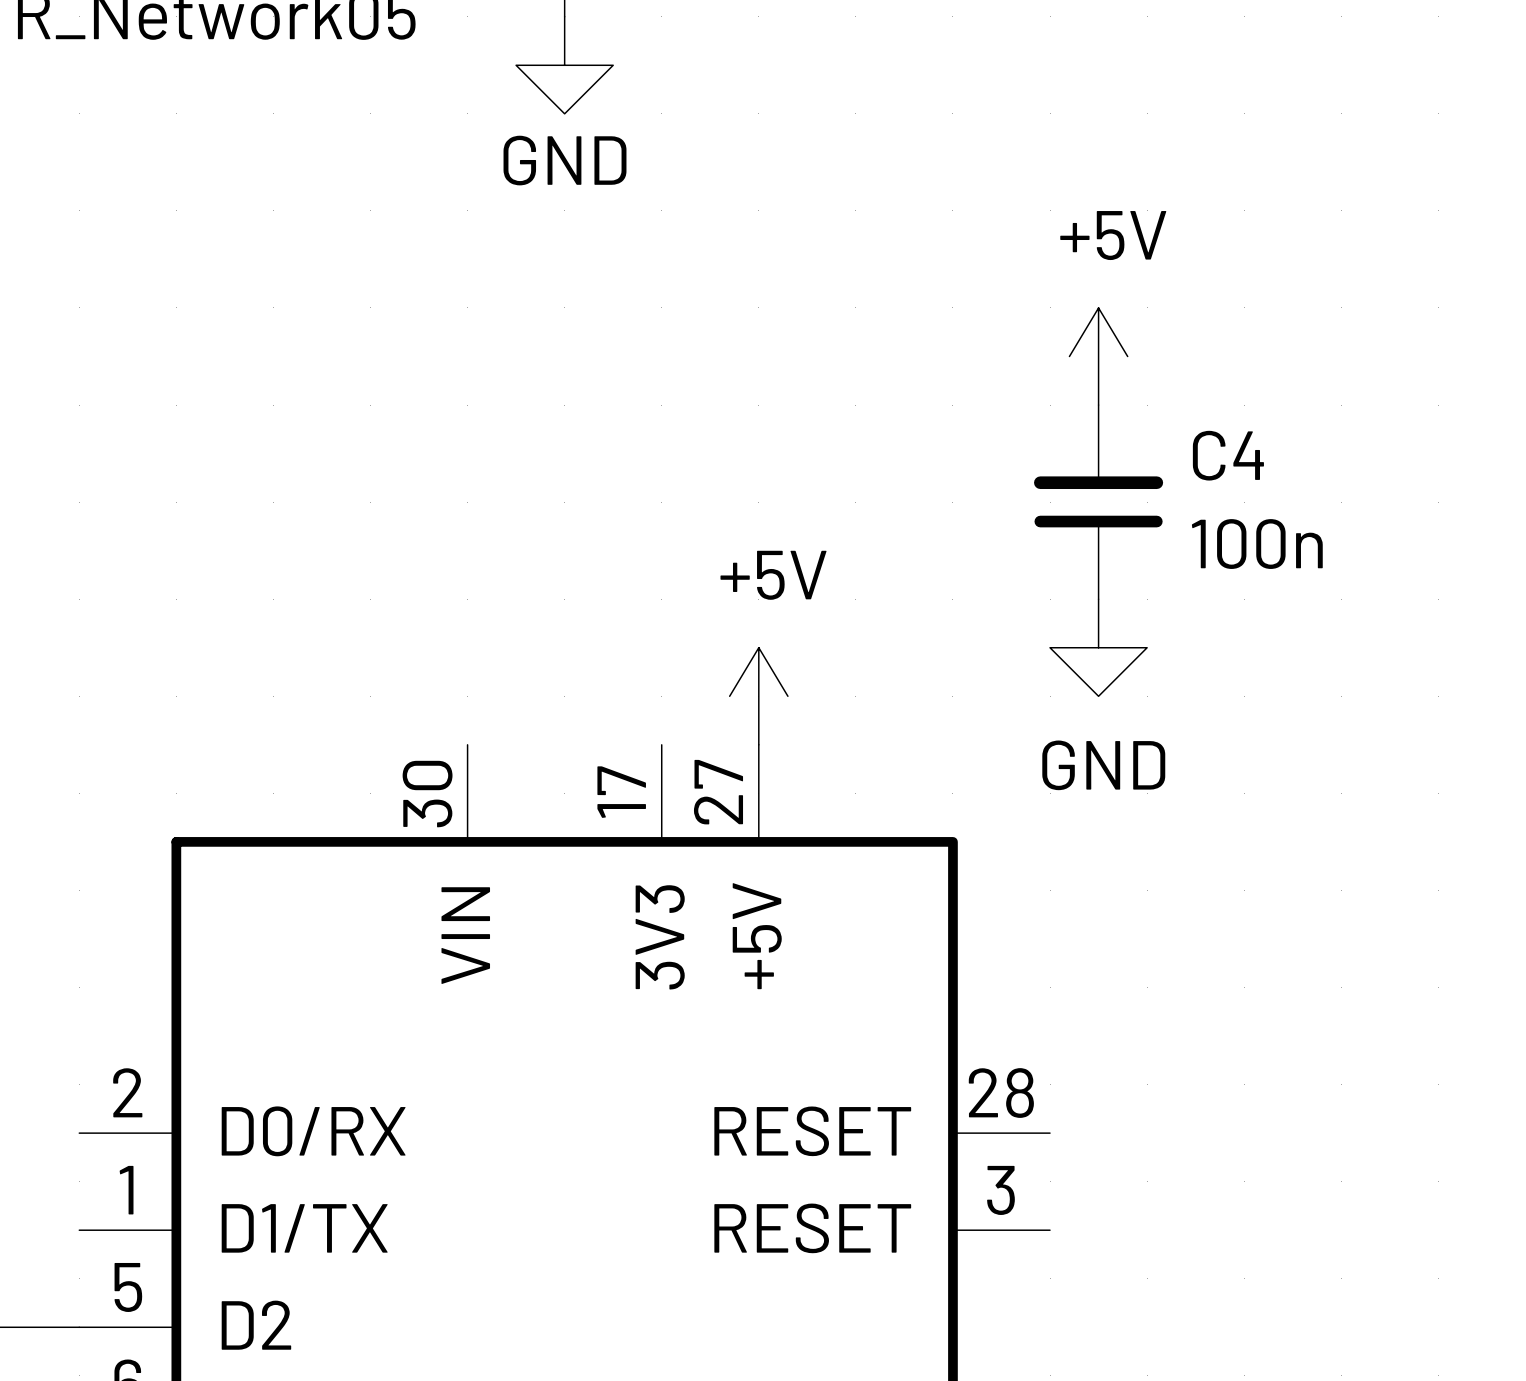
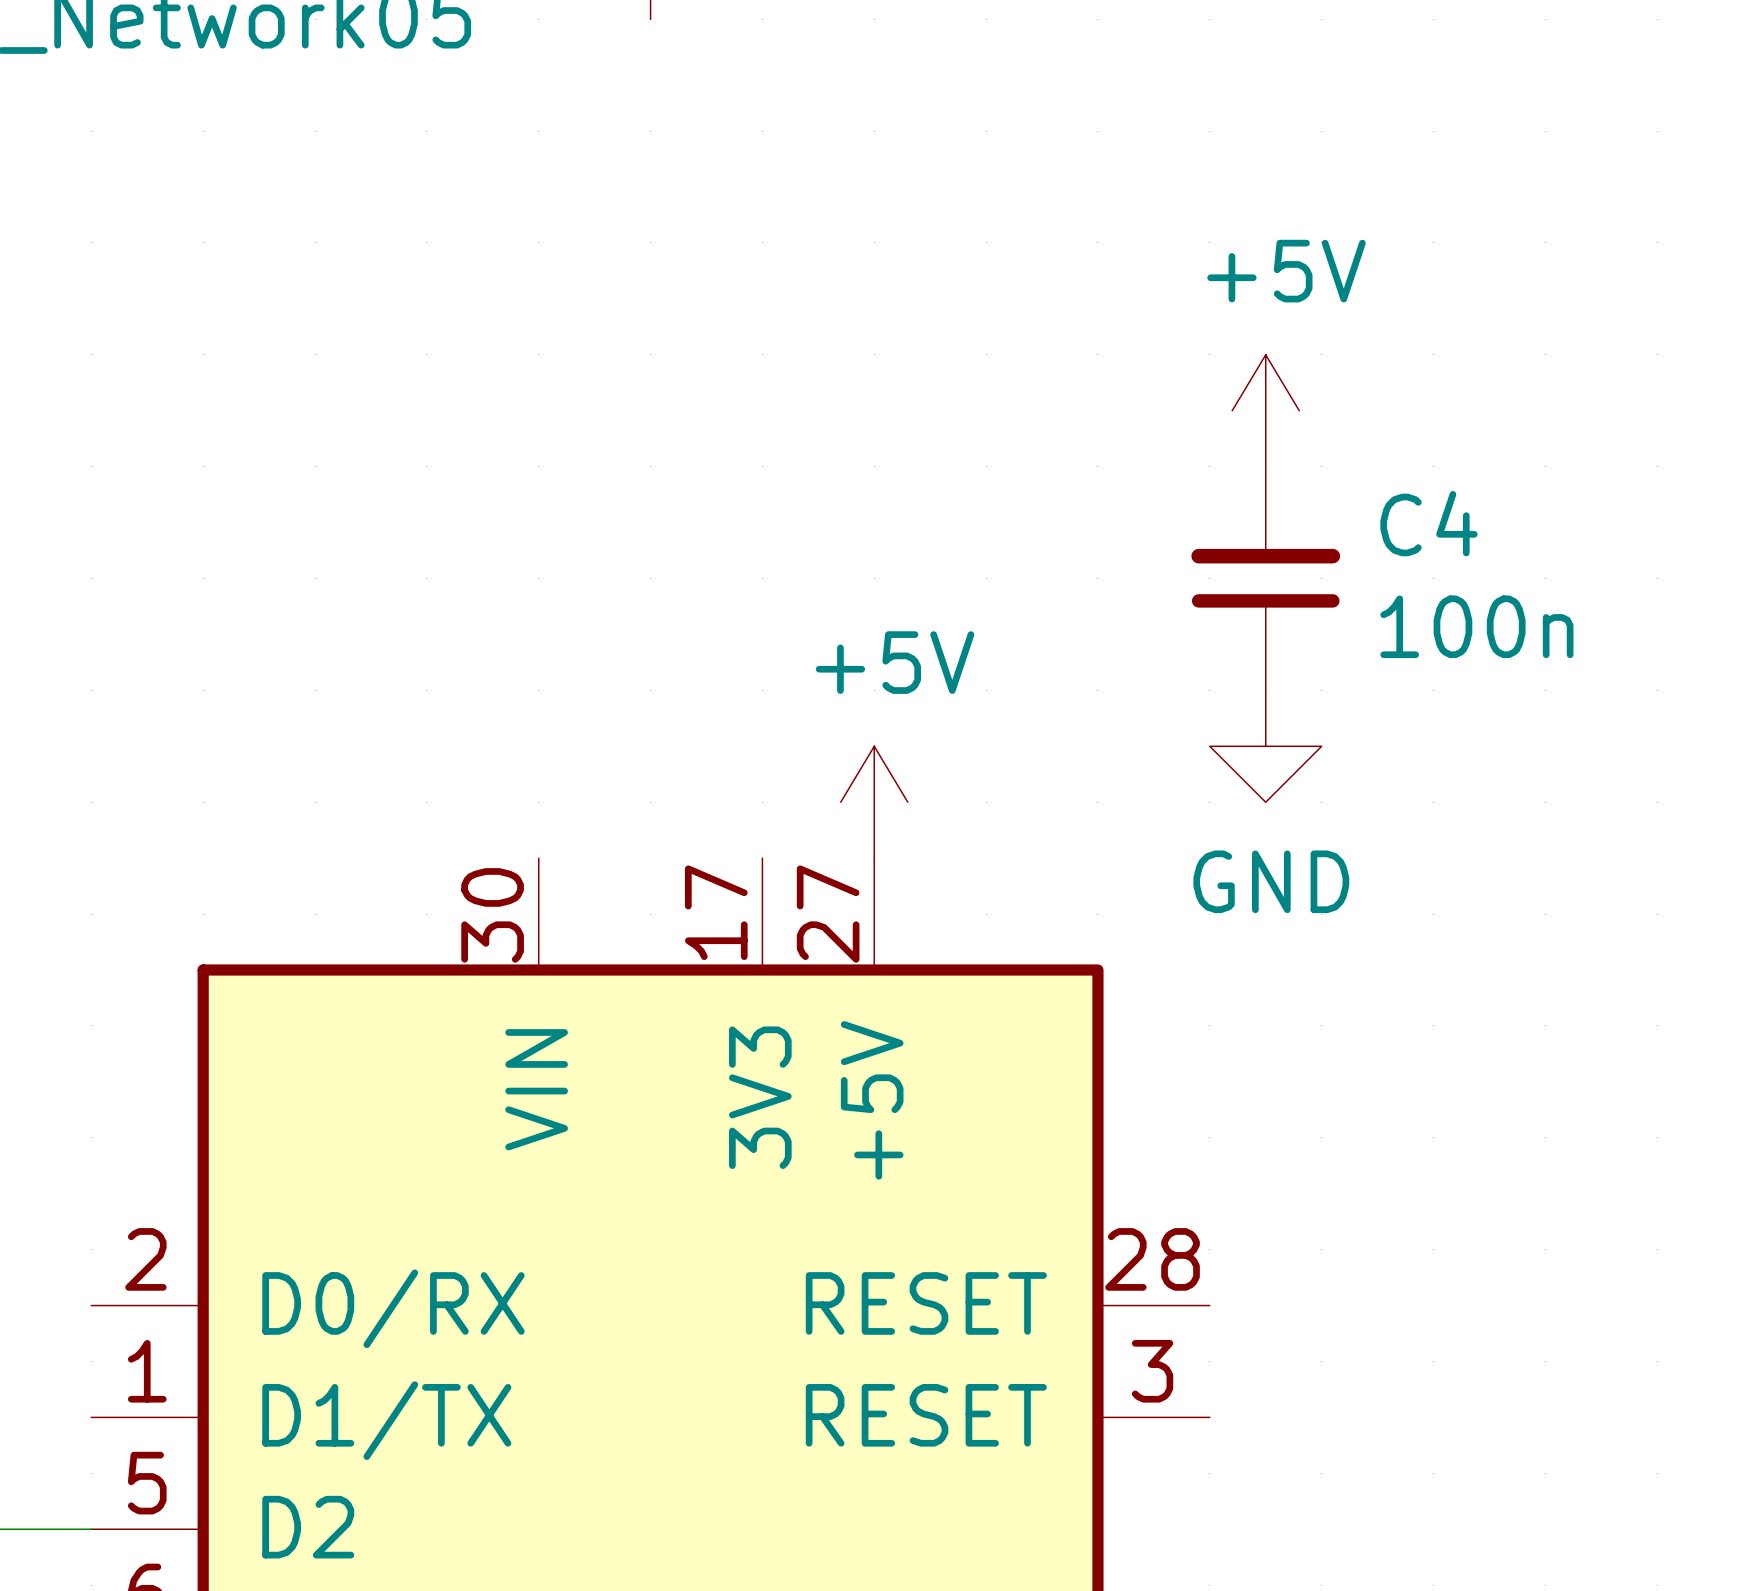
power symbol: GND (564, 65) -> none

